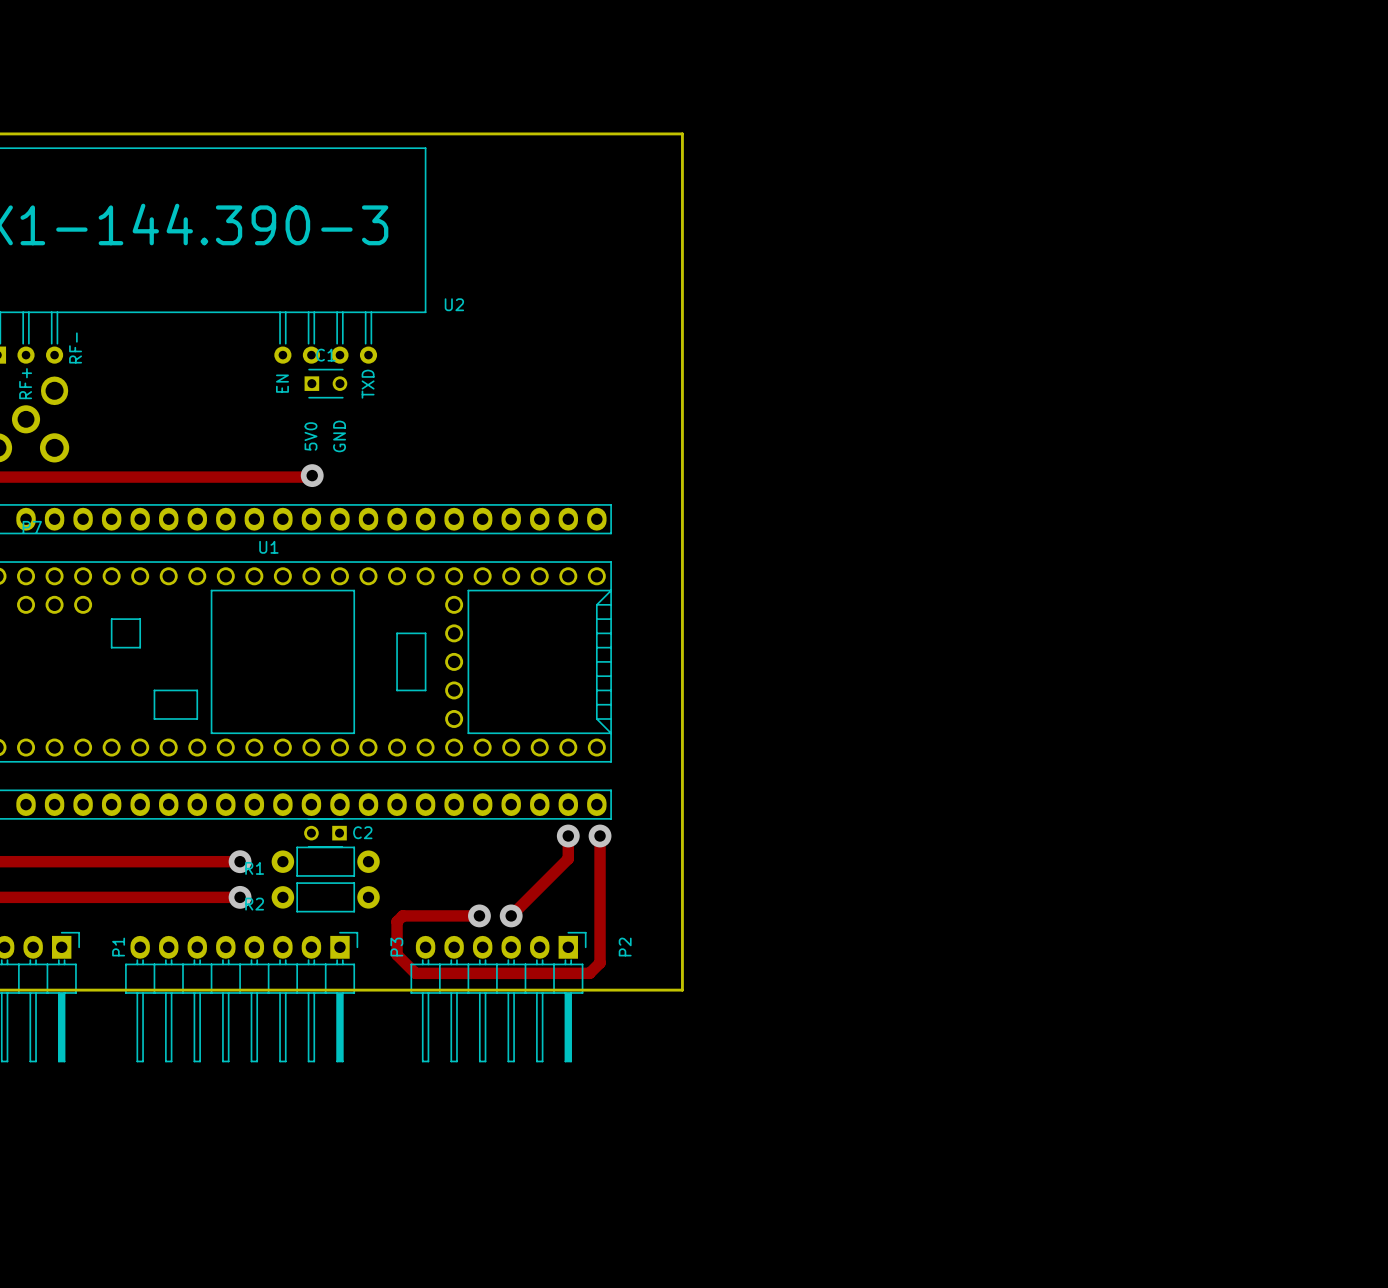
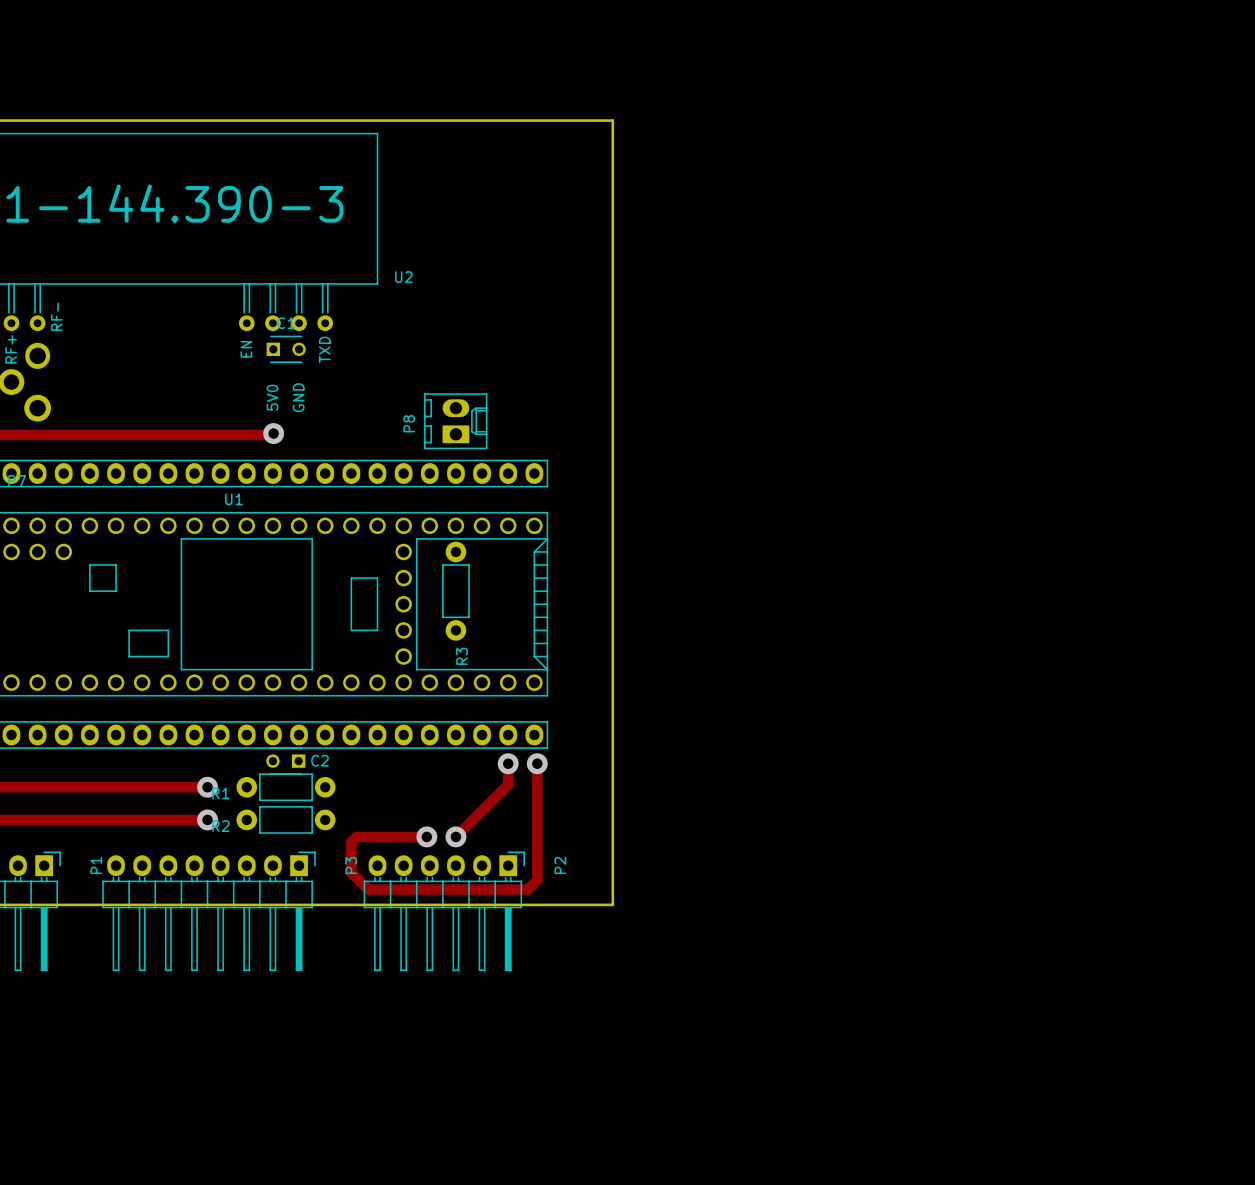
P8: none -> (455, 421)
R3: none -> (455, 591)

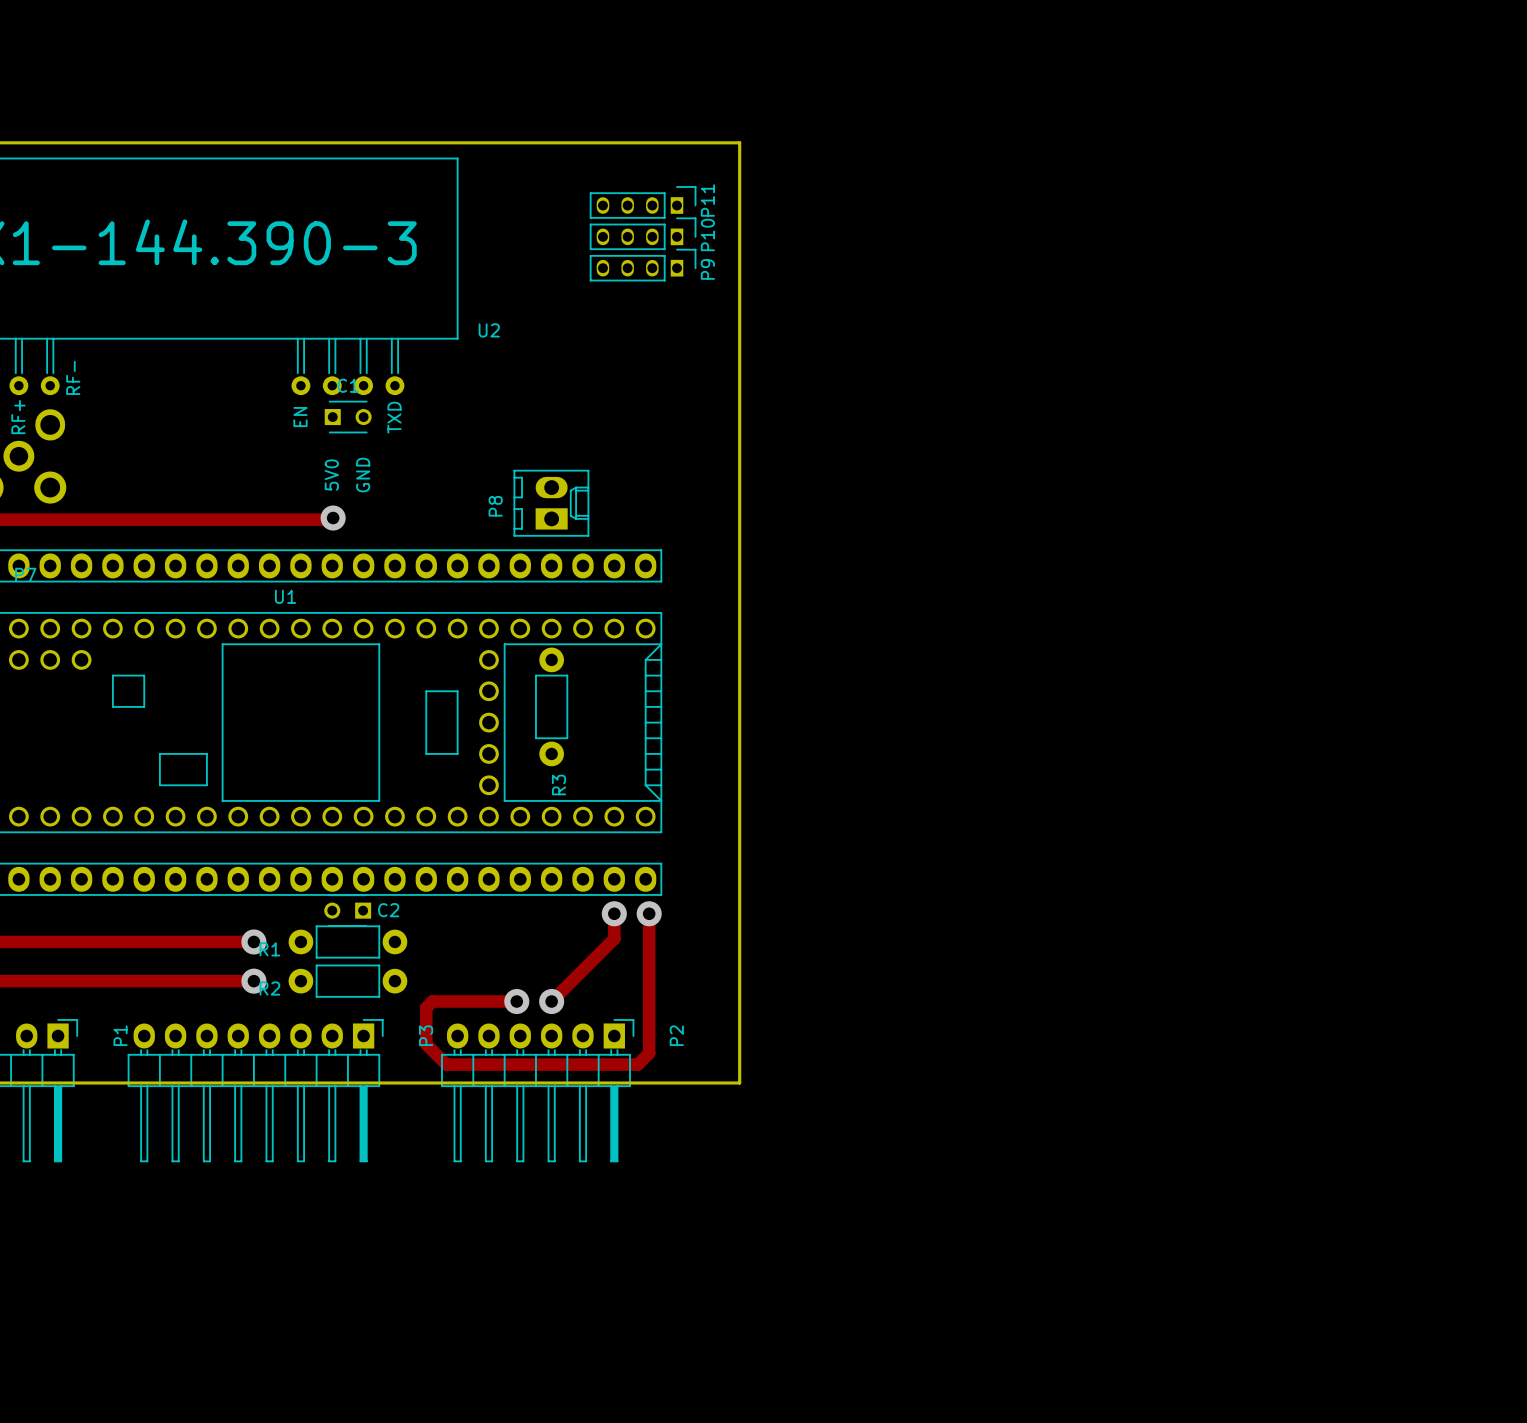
P11: none -> (643, 202)
P10: none -> (643, 233)
P9: none -> (643, 265)

